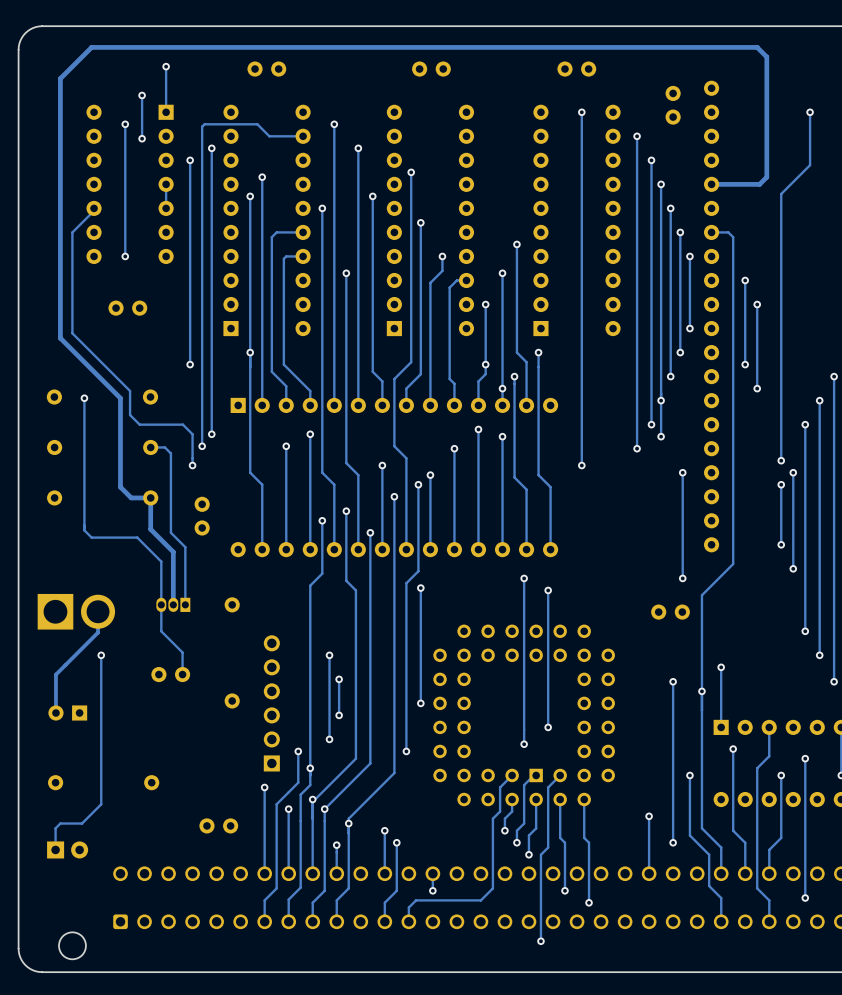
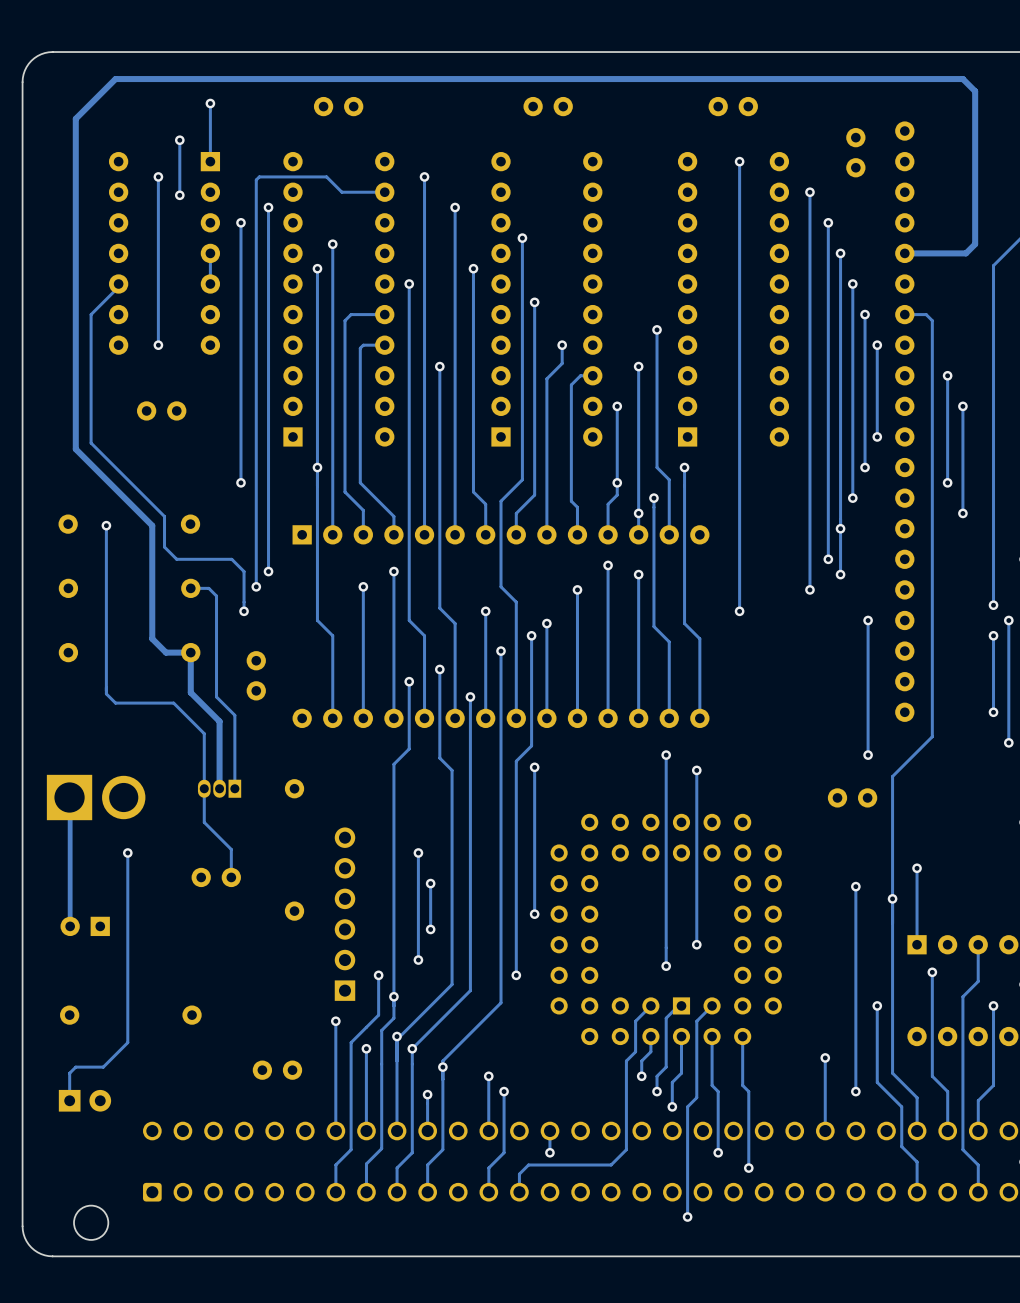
track: (98, 611) (98, 632) (55, 674) -> (69, 797) (70, 877)

